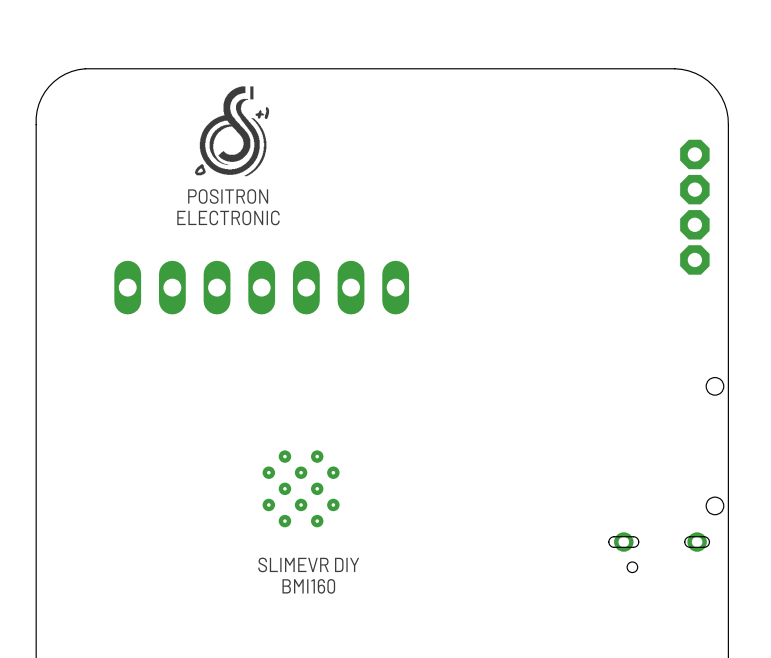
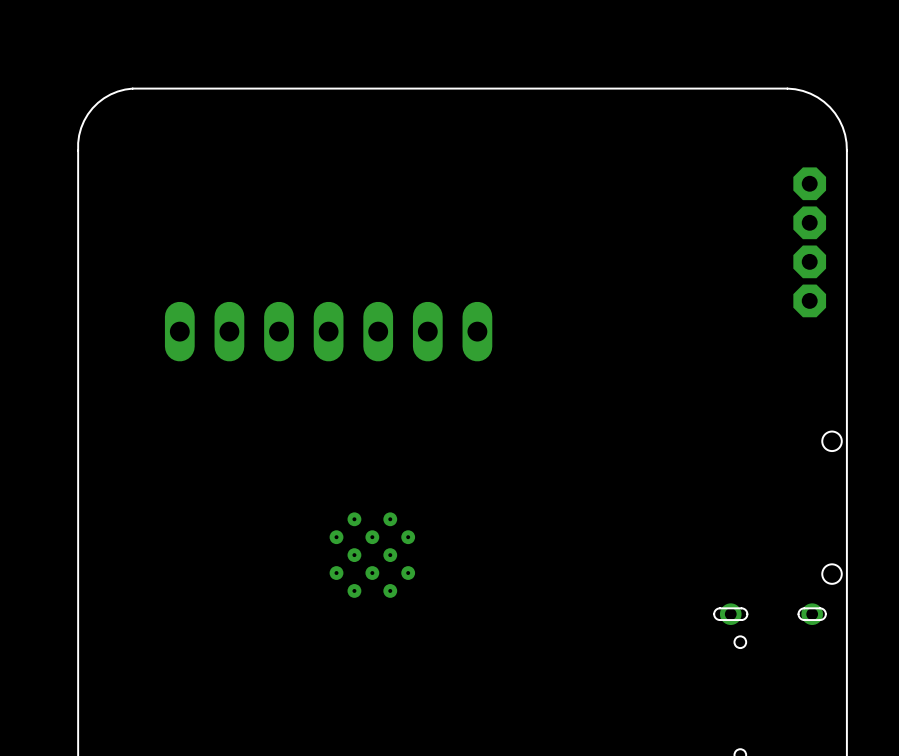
drawing: [194, 86, 270, 177] -> none
text: POSITRON (228, 196) -> none
text: ELECTRONIC (228, 217) -> none
text: SLIMEVR DIY (308, 564) -> none
text: BMI160 (308, 586) -> none

